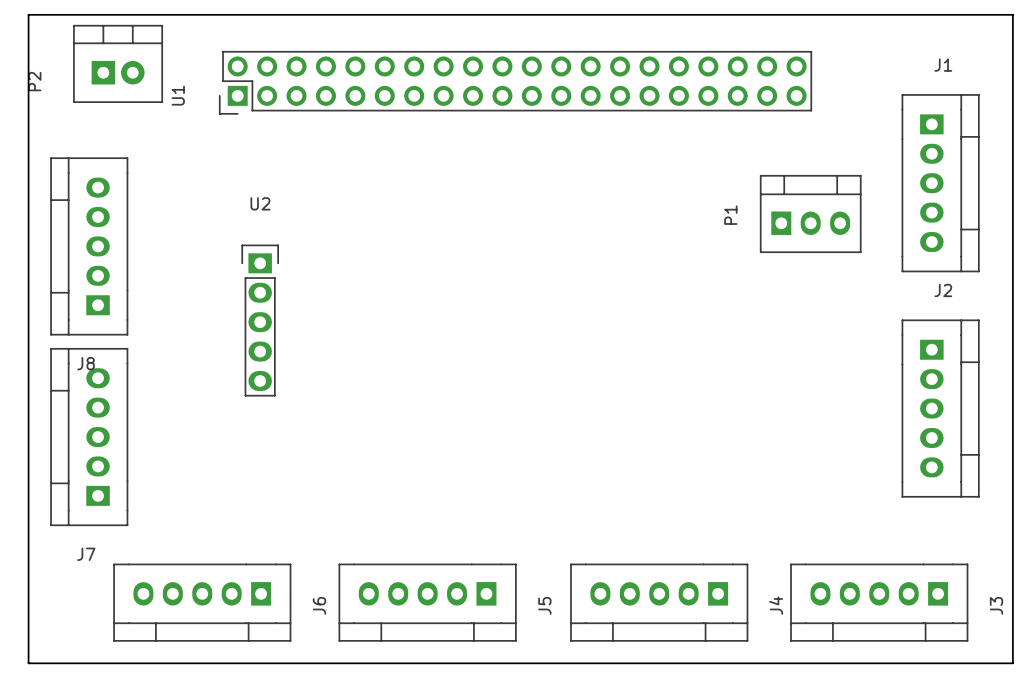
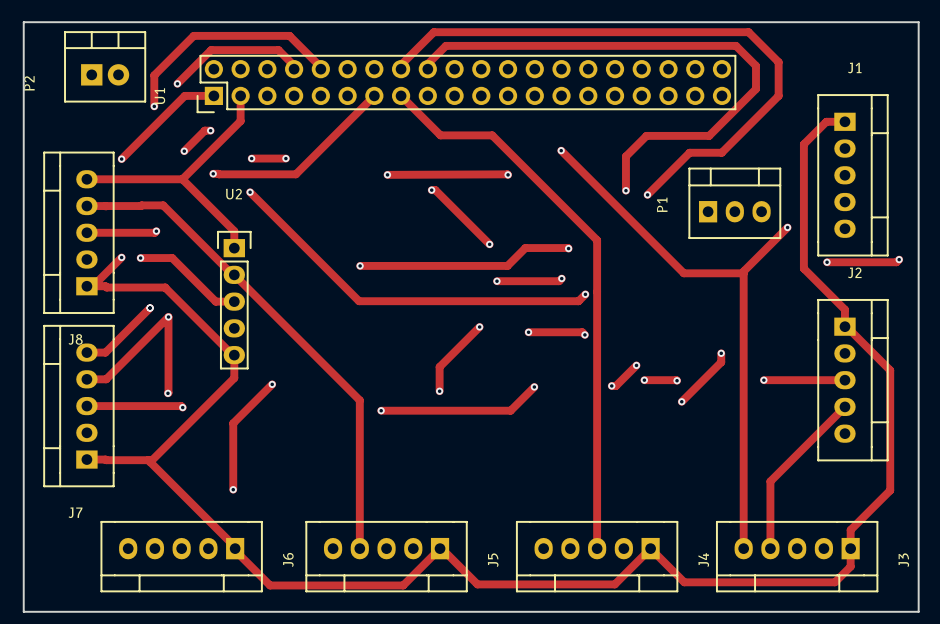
track: none -> (294, 69) (294, 65) (278, 50) (211, 50) (177, 83)
track: none -> (320, 69) (289, 35) (193, 35) (154, 75) (154, 106)
track: none -> (401, 69) (401, 64) (433, 32) (748, 32) (778, 62) (778, 95) (721, 152) (689, 152) (647, 194)
track: none -> (427, 69) (427, 64) (445, 45) (735, 45) (756, 65) (756, 89) (709, 135) (646, 135) (625, 156) (625, 190)
via: none -> (177, 83)
track: none -> (213, 95) (184, 95) (121, 159)
track: none -> (240, 95) (240, 121) (182, 179)
track: none -> (374, 95) (295, 174) (213, 173)
track: none -> (401, 95) (440, 135) (492, 135) (597, 240) (597, 548)
via: none -> (154, 106)
track: none -> (844, 121) (826, 121) (803, 144) (803, 268) (844, 309) (844, 326) (890, 370) (890, 490) (850, 530) (850, 566) (834, 582) (684, 582) (650, 548) (614, 584) (477, 584) (440, 548) (403, 585) (270, 585) (235, 550) (235, 547) (148, 460)
track: none -> (210, 130) (204, 130) (184, 151)
via: none -> (210, 130)
via: none -> (184, 151)
track: none -> (561, 150) (683, 273) (743, 273)
via: none -> (561, 150)
track: none -> (251, 158) (285, 158)
via: none -> (251, 158)
via: none -> (285, 158)
via: none -> (121, 159)
via: none -> (213, 173)
track: none -> (387, 174) (508, 174)
via: none -> (387, 174)
via: none -> (508, 174)
track: none -> (86, 179) (182, 179)
track: none -> (182, 179) (234, 231) (234, 248)
track: none -> (431, 190) (435, 190) (489, 244)
via: none -> (431, 190)
via: none -> (625, 190)
track: none -> (250, 192) (359, 301) (578, 301) (585, 294)
via: none -> (250, 192)
via: none -> (647, 194)
track: none -> (86, 206) (163, 205) (359, 400) (359, 548)
track: none -> (787, 227) (743, 271) (743, 548)
via: none -> (787, 227)
track: none -> (156, 231) (154, 232) (86, 232)
via: none -> (156, 231)
via: none -> (489, 244)
track: none -> (568, 248) (525, 248) (507, 265) (360, 265)
via: none -> (568, 248)
track: none -> (121, 257) (92, 286)
via: none -> (121, 257)
track: none -> (140, 258) (172, 258) (215, 301) (234, 301)
via: none -> (140, 258)
track: none -> (899, 259) (896, 262) (827, 262)
via: none -> (899, 259)
via: none -> (827, 262)
via: none -> (360, 265)
track: none -> (561, 278) (559, 281) (497, 281)
via: none -> (561, 278)
via: none -> (497, 281)
track: none -> (86, 286) (165, 287) (234, 355) (234, 378) (150, 462) (150, 460) (86, 459)
via: none -> (585, 294)
track: none -> (150, 308) (105, 352) (86, 352)
via: none -> (150, 308)
via: none -> (168, 317)
track: none -> (479, 327) (439, 367) (439, 391)
via: none -> (479, 327)
track: none -> (528, 332) (582, 332) (584, 334)
via: none -> (528, 332)
via: none -> (584, 334)
track: none -> (721, 353) (721, 362) (681, 401)
via: none -> (721, 353)
track: none -> (636, 365) (615, 385) (611, 385)
via: none -> (636, 365)
track: none -> (86, 379) (106, 379) (168, 317) (167, 393)
track: none -> (644, 380) (677, 380)
via: none -> (644, 380)
track: none -> (763, 380) (844, 380)
via: none -> (763, 380)
via: none -> (677, 380)
track: none -> (272, 384) (233, 423) (233, 489)
via: none -> (272, 384)
via: none -> (611, 385)
track: none -> (534, 387) (510, 410) (381, 410)
via: none -> (534, 387)
via: none -> (439, 391)
via: none -> (167, 393)
via: none -> (681, 401)
track: none -> (85, 406) (182, 407)
track: none -> (844, 406) (770, 481) (770, 548)
via: none -> (182, 407)
via: none -> (381, 410)
via: none -> (233, 489)

